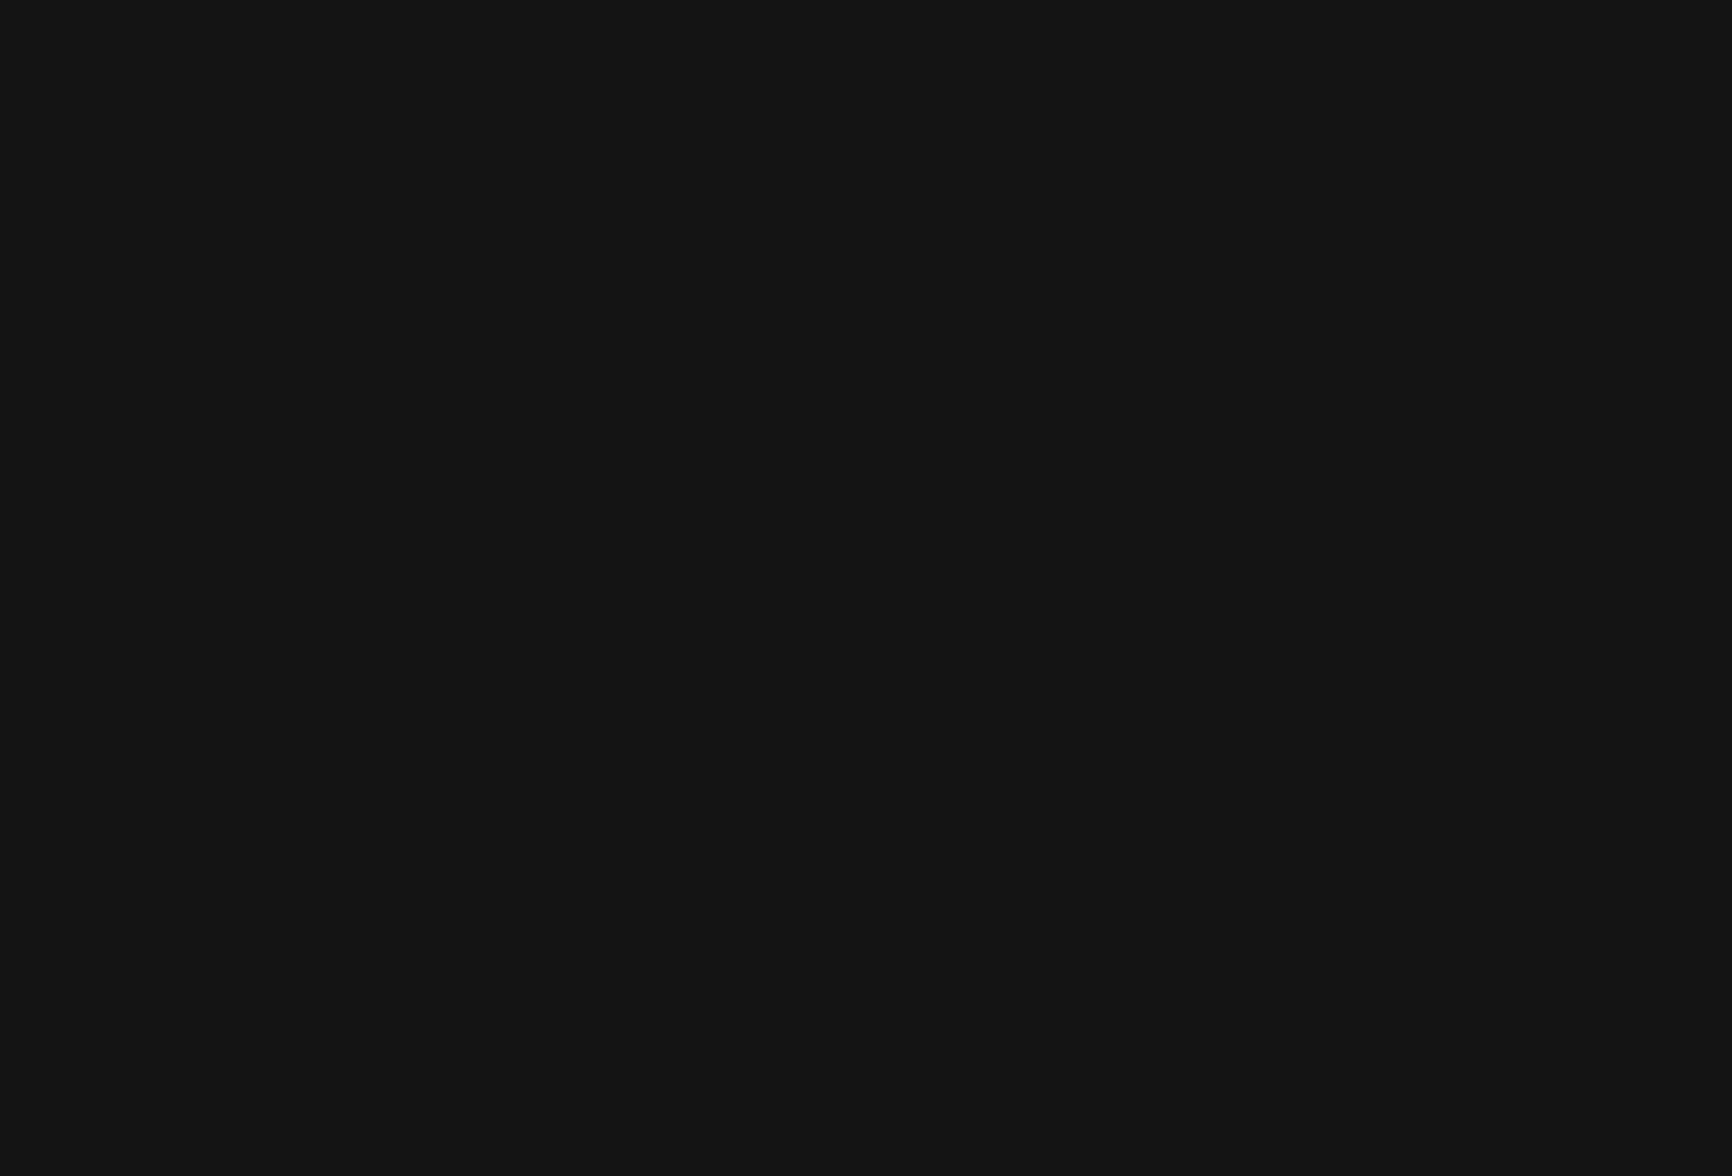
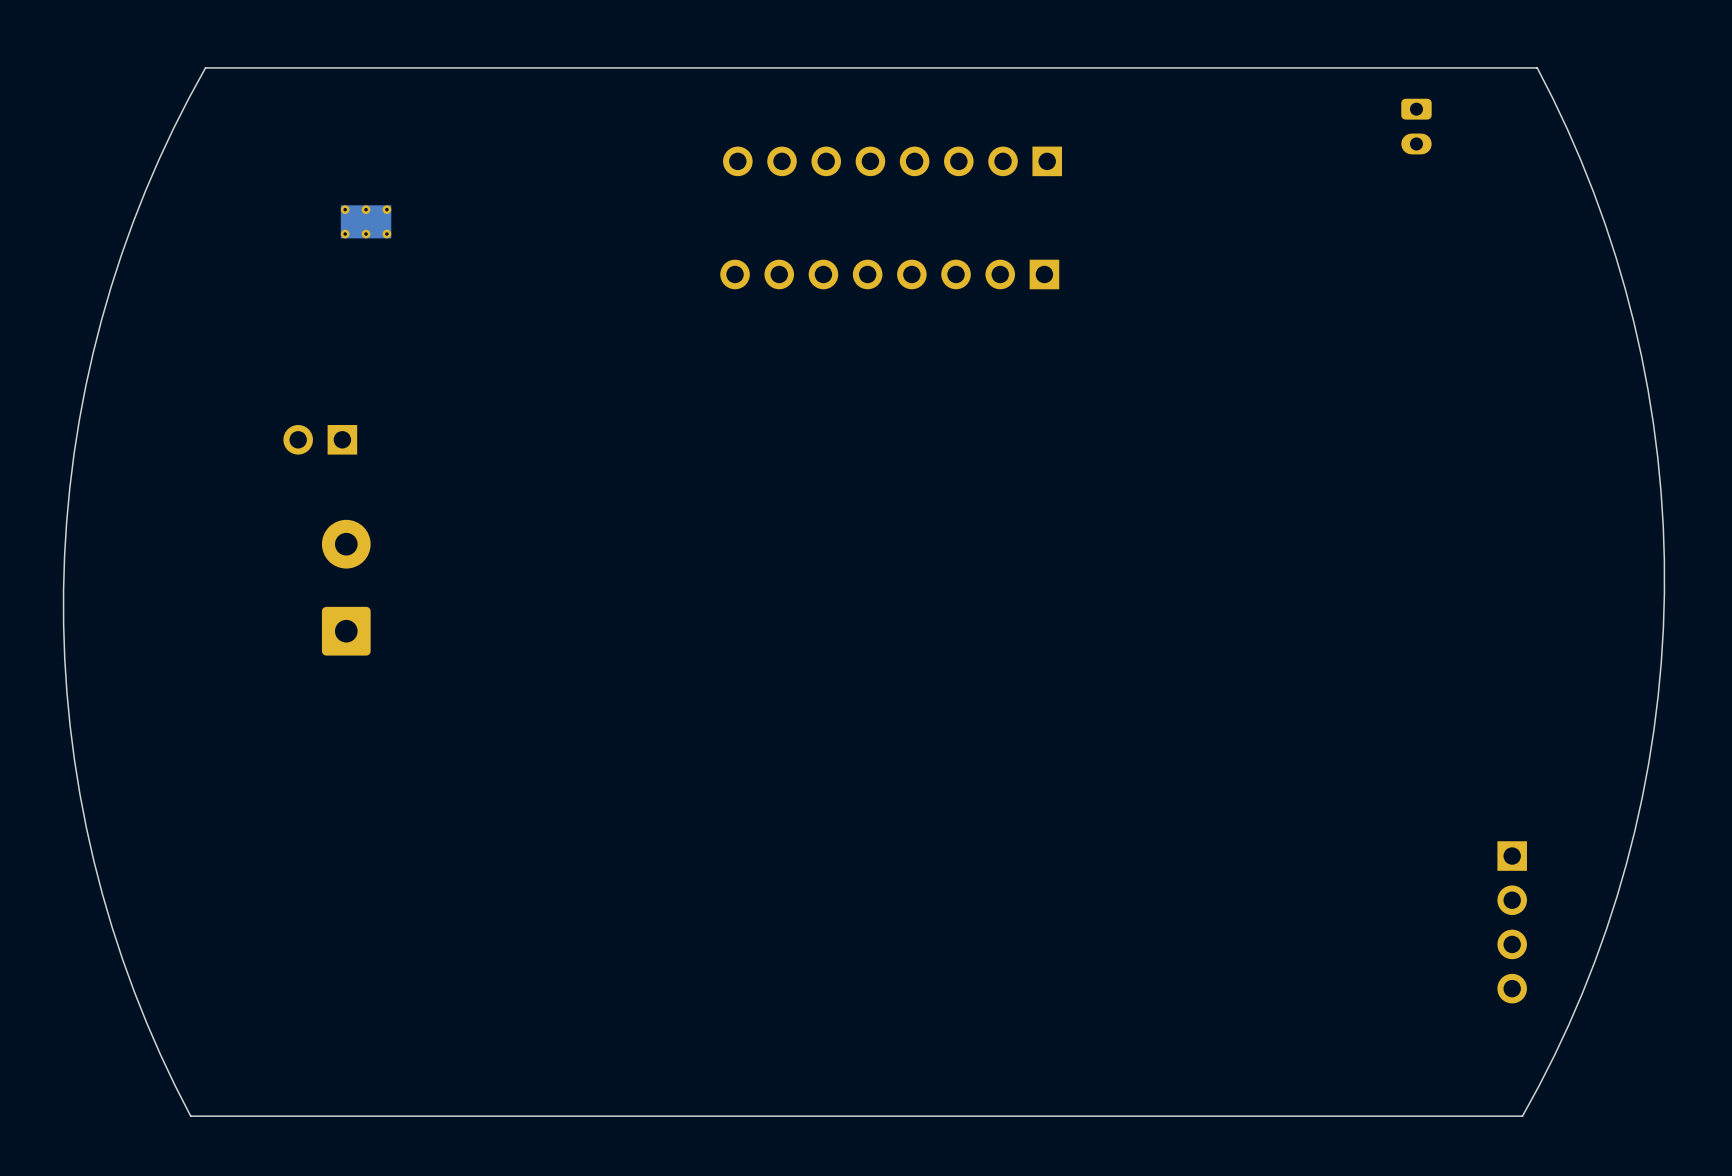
board edge: none -> (1537, 67) (205, 67) (173, 128) (145, 190) (121, 254) (101, 320) (85, 386) (74, 453) (66, 521) (63, 590) (64, 658) (70, 726) (79, 794) (93, 861) (112, 927) (134, 991) (160, 1054) (190, 1116) (1522, 1116) (1554, 1055) (1582, 993) (1606, 929) (1626, 864) (1642, 797) (1653, 730) (1661, 662) (1664, 593) (1663, 525) (1657, 457) (1648, 389) (1634, 322) (1615, 257) (1593, 192) (1567, 129) (1537, 67)
part: none -> (1416, 126)
part: none -> (892, 161)
part: none -> (366, 221)
part: none -> (889, 274)
part: none -> (320, 439)
part: none -> (346, 587)
part: none -> (1512, 922)

